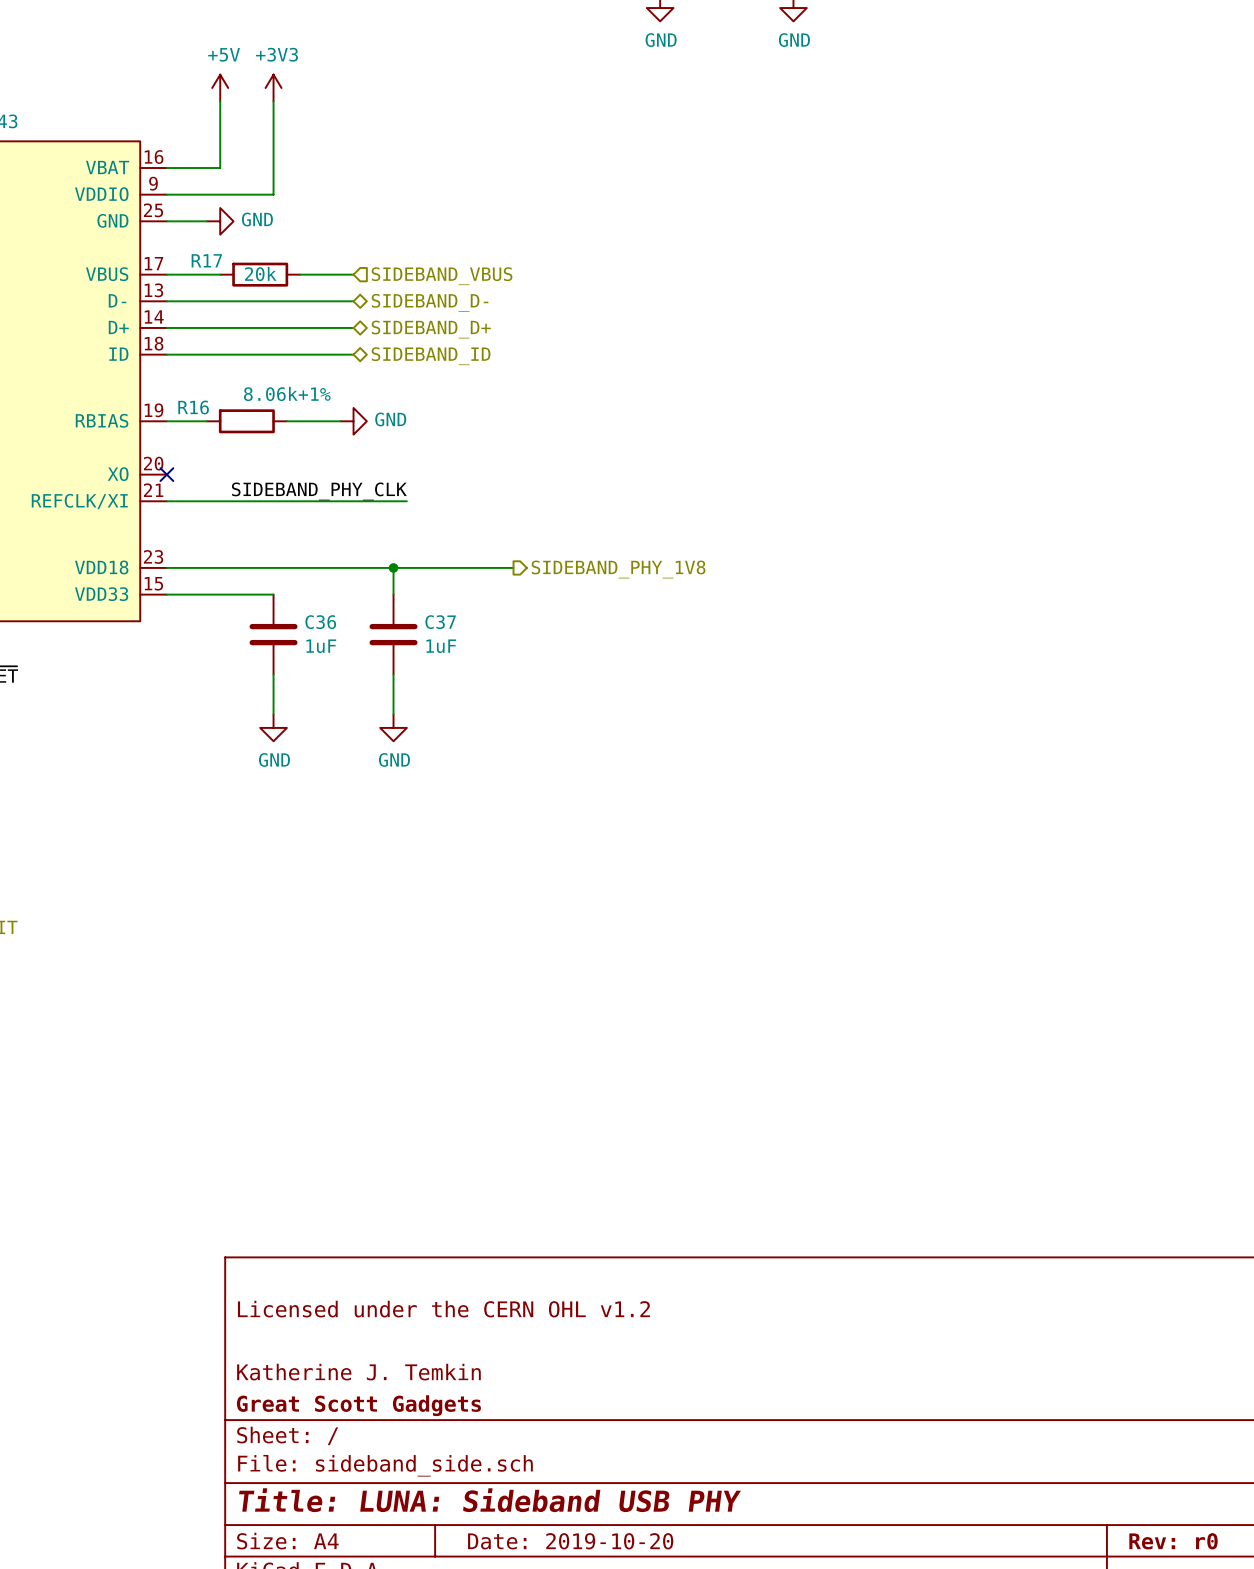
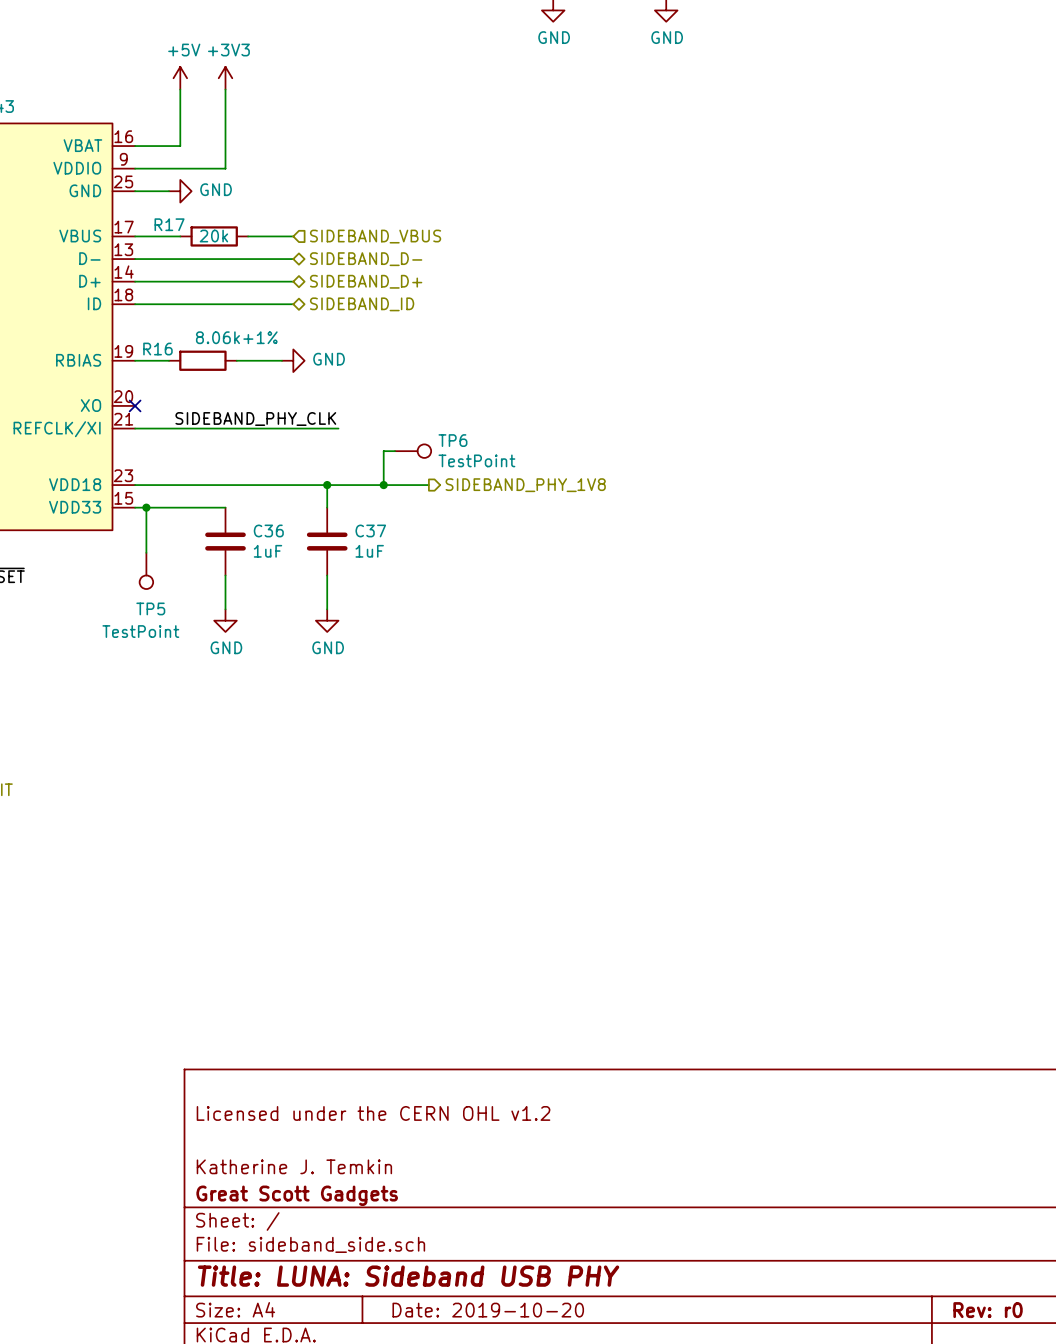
wire: none -> (395, 451) (383, 451) (383, 485)
TP6: none -> TestPoint (413, 451)
junction: none -> (383, 485)
wire: none -> (146, 507) (146, 552)
junction: none -> (146, 507)
TP5: none -> TestPoint (146, 570)

